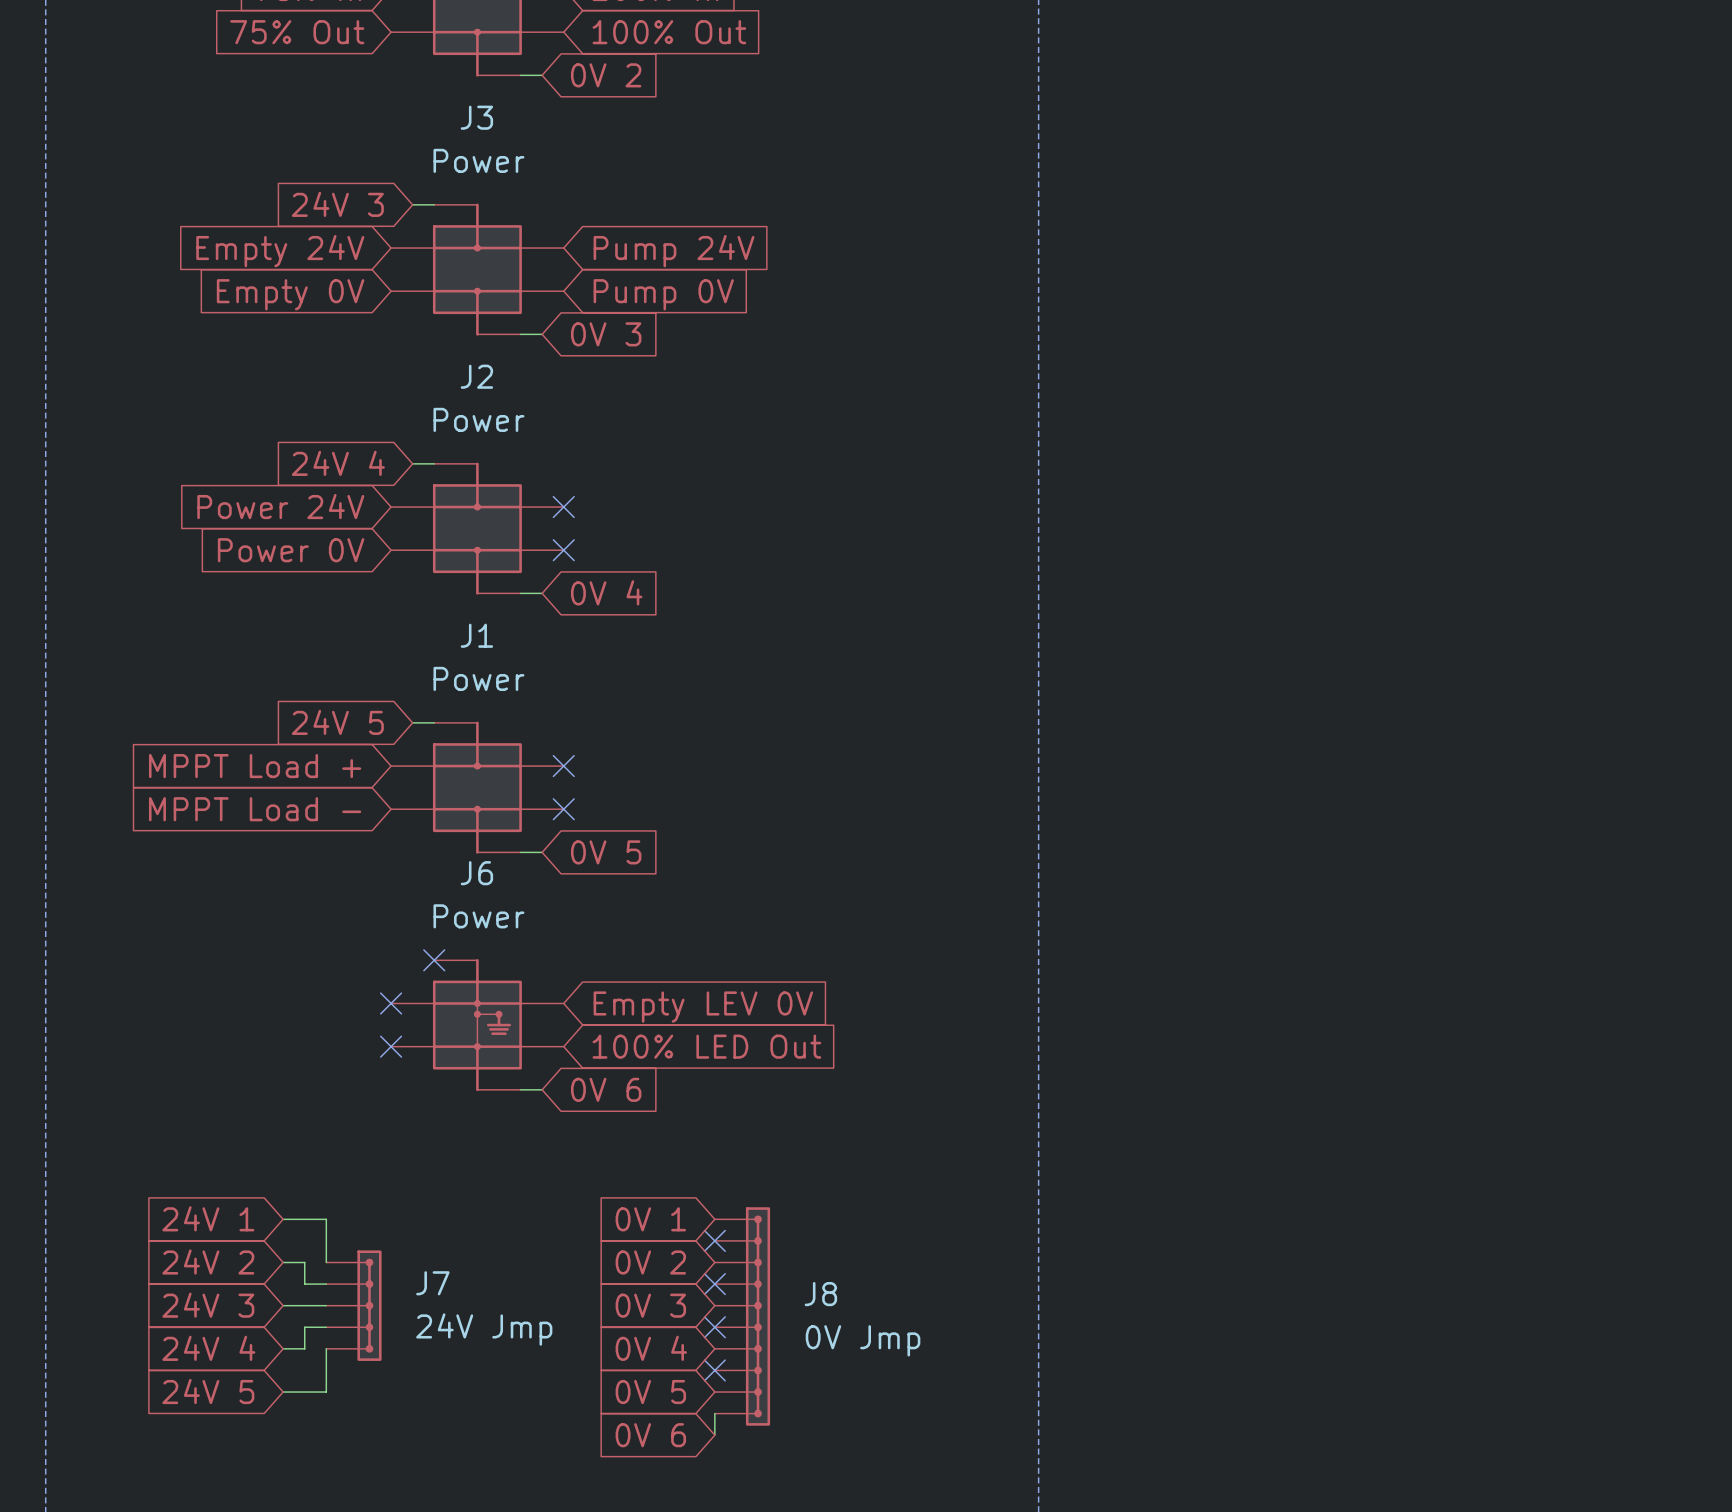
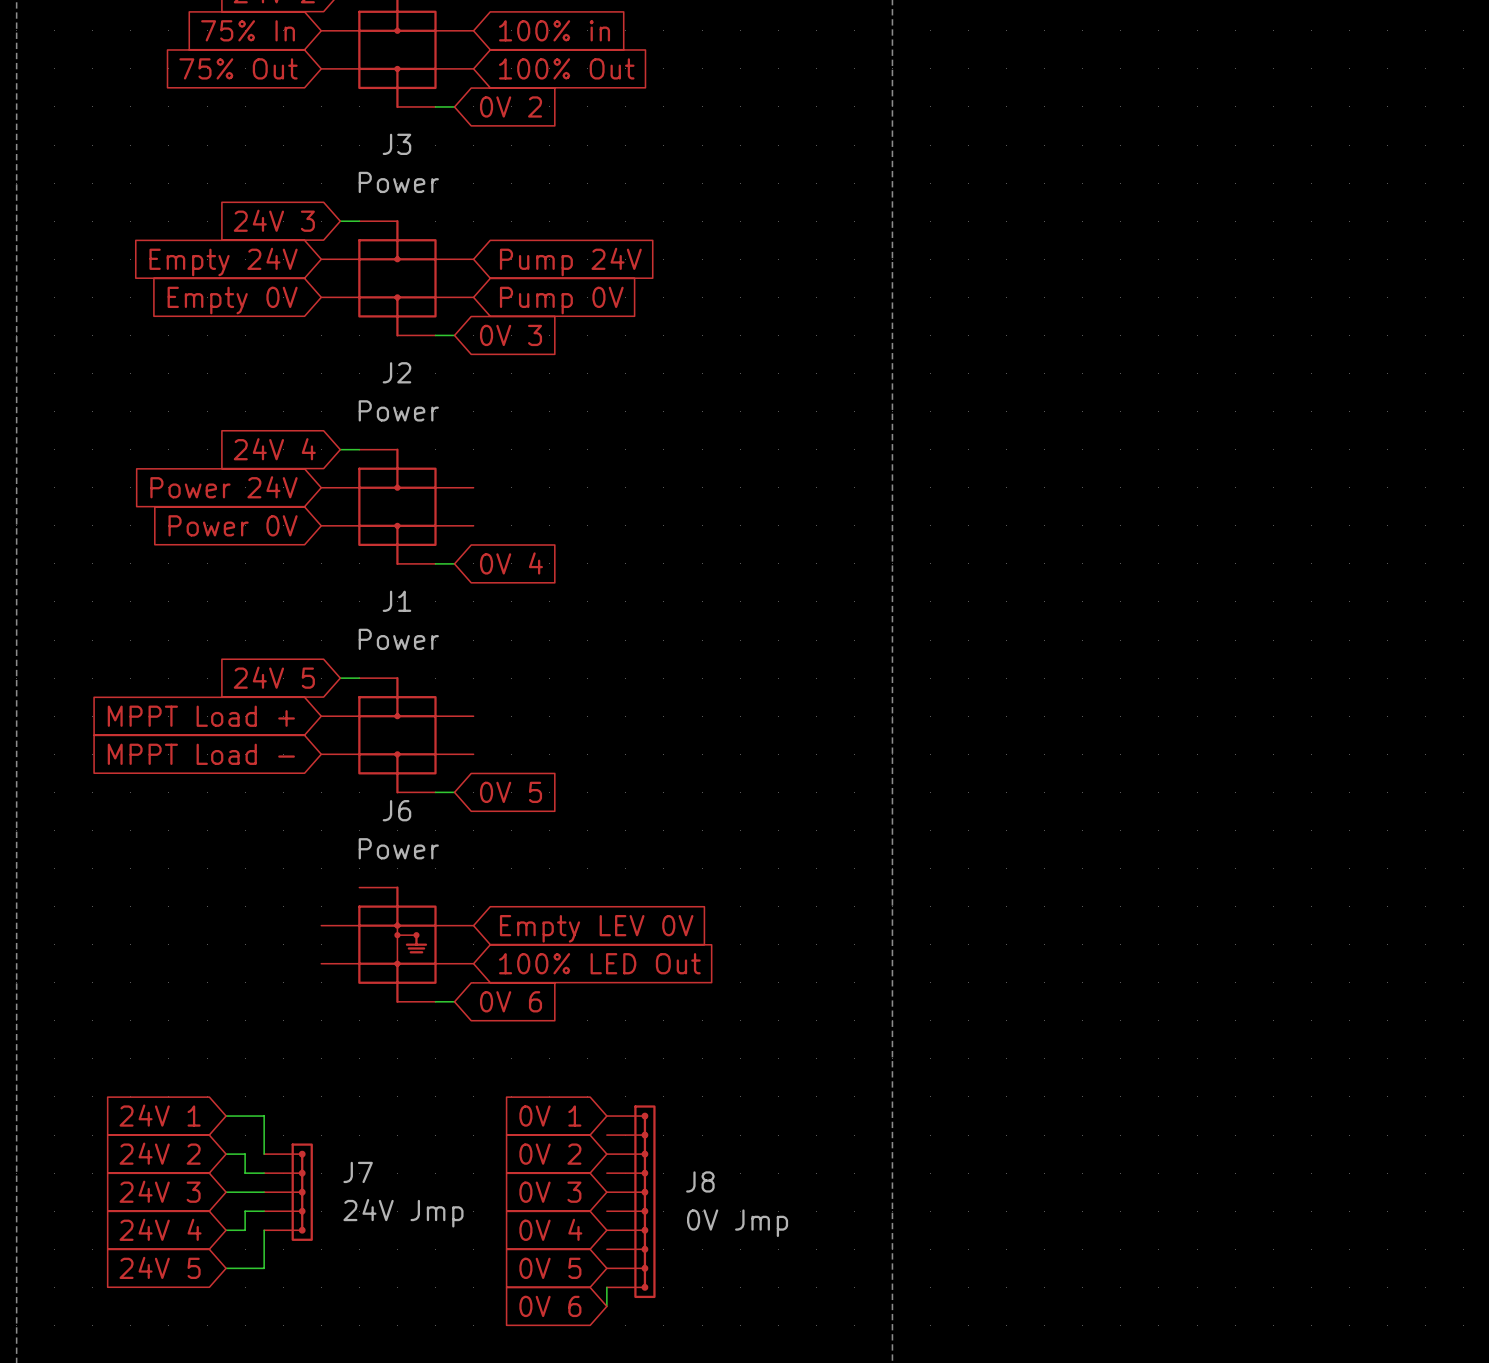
no-connect mark: (563, 507) -> none
no-connect mark: (563, 550) -> none
no-connect mark: (563, 766) -> none
no-connect mark: (563, 809) -> none
no-connect mark: (434, 960) -> none
no-connect mark: (391, 1003) -> none
no-connect mark: (391, 1046) -> none
no-connect mark: (714, 1240) -> none
no-connect mark: (714, 1284) -> none
no-connect mark: (714, 1327) -> none
no-connect mark: (714, 1370) -> none

